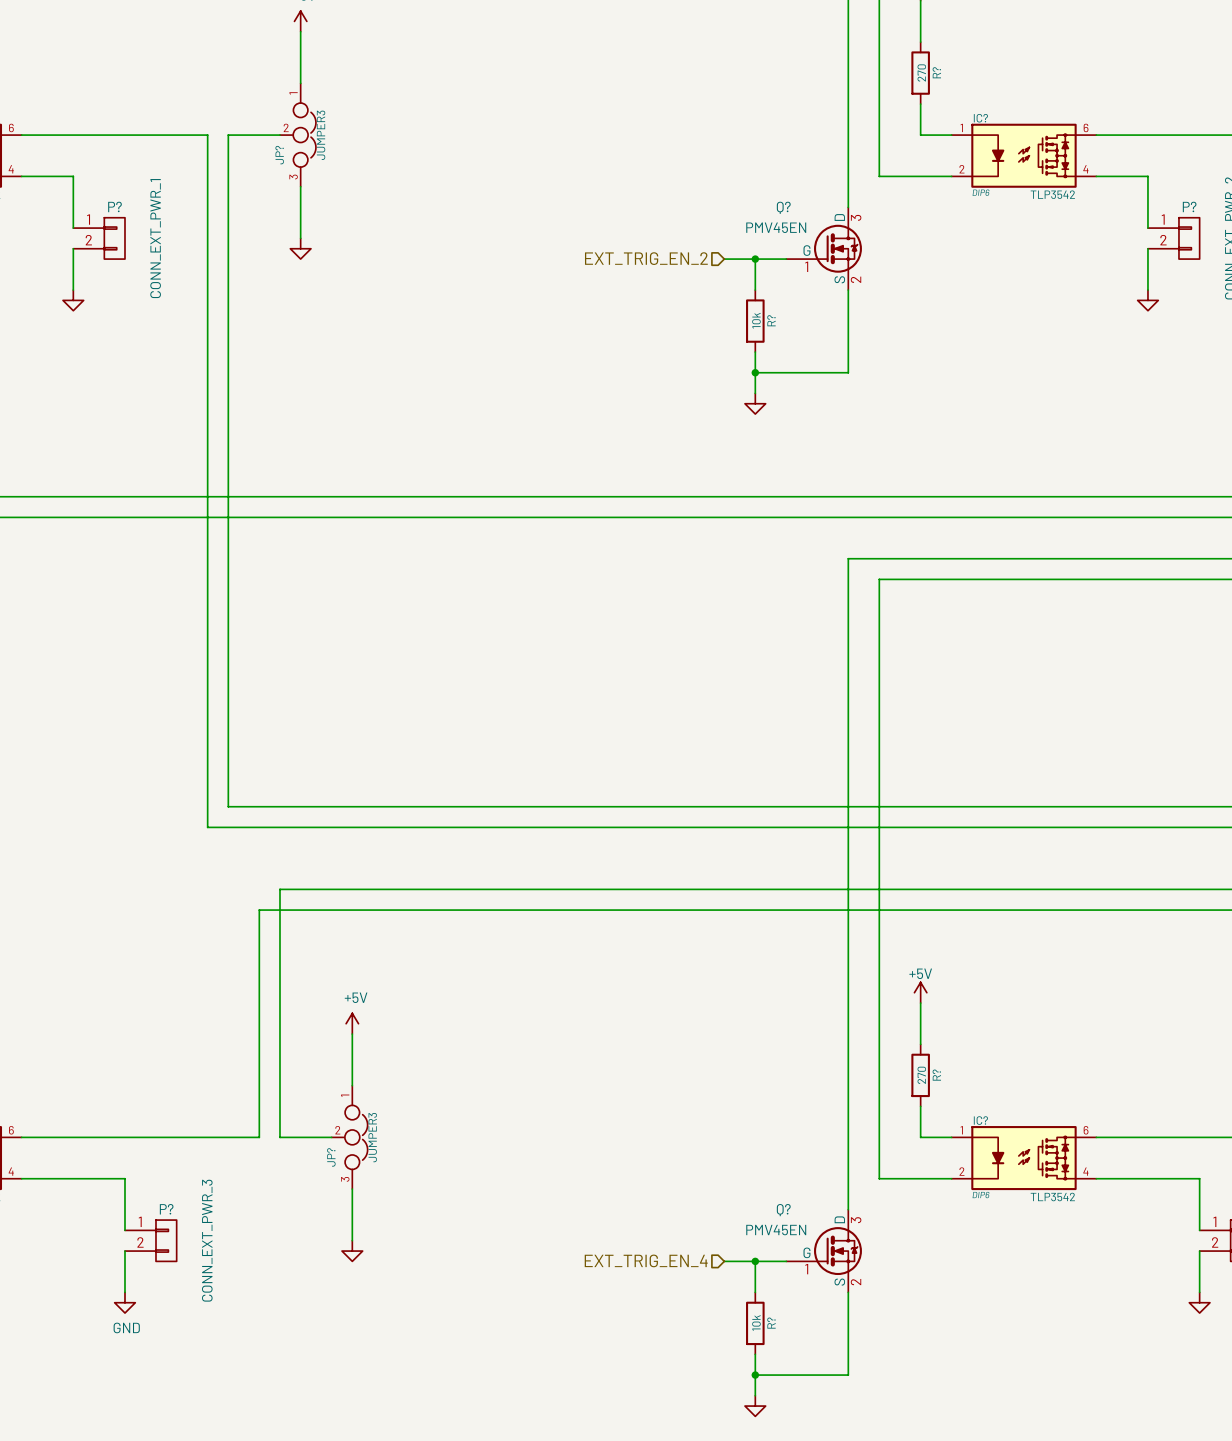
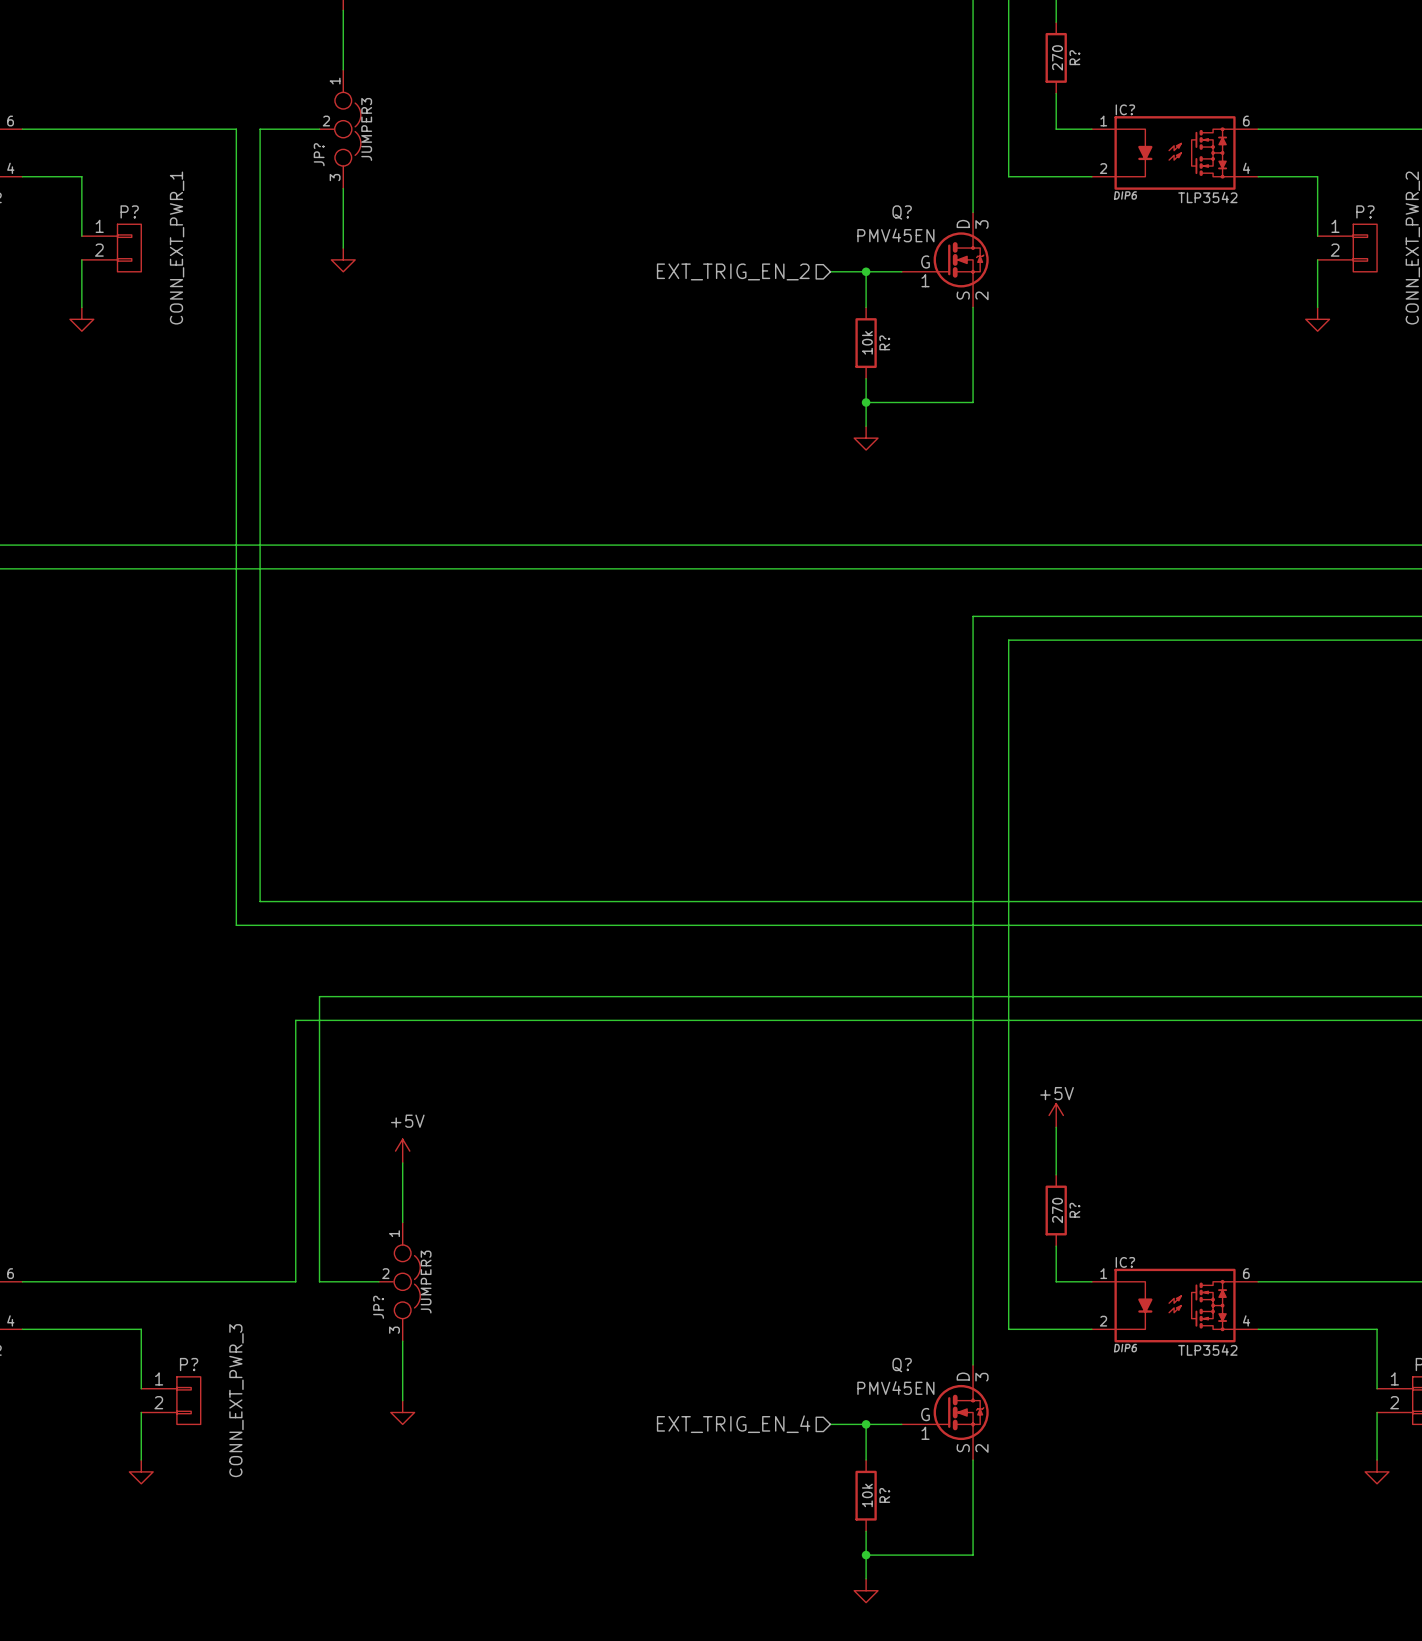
power symbol text: GND (126, 1327) -> none

